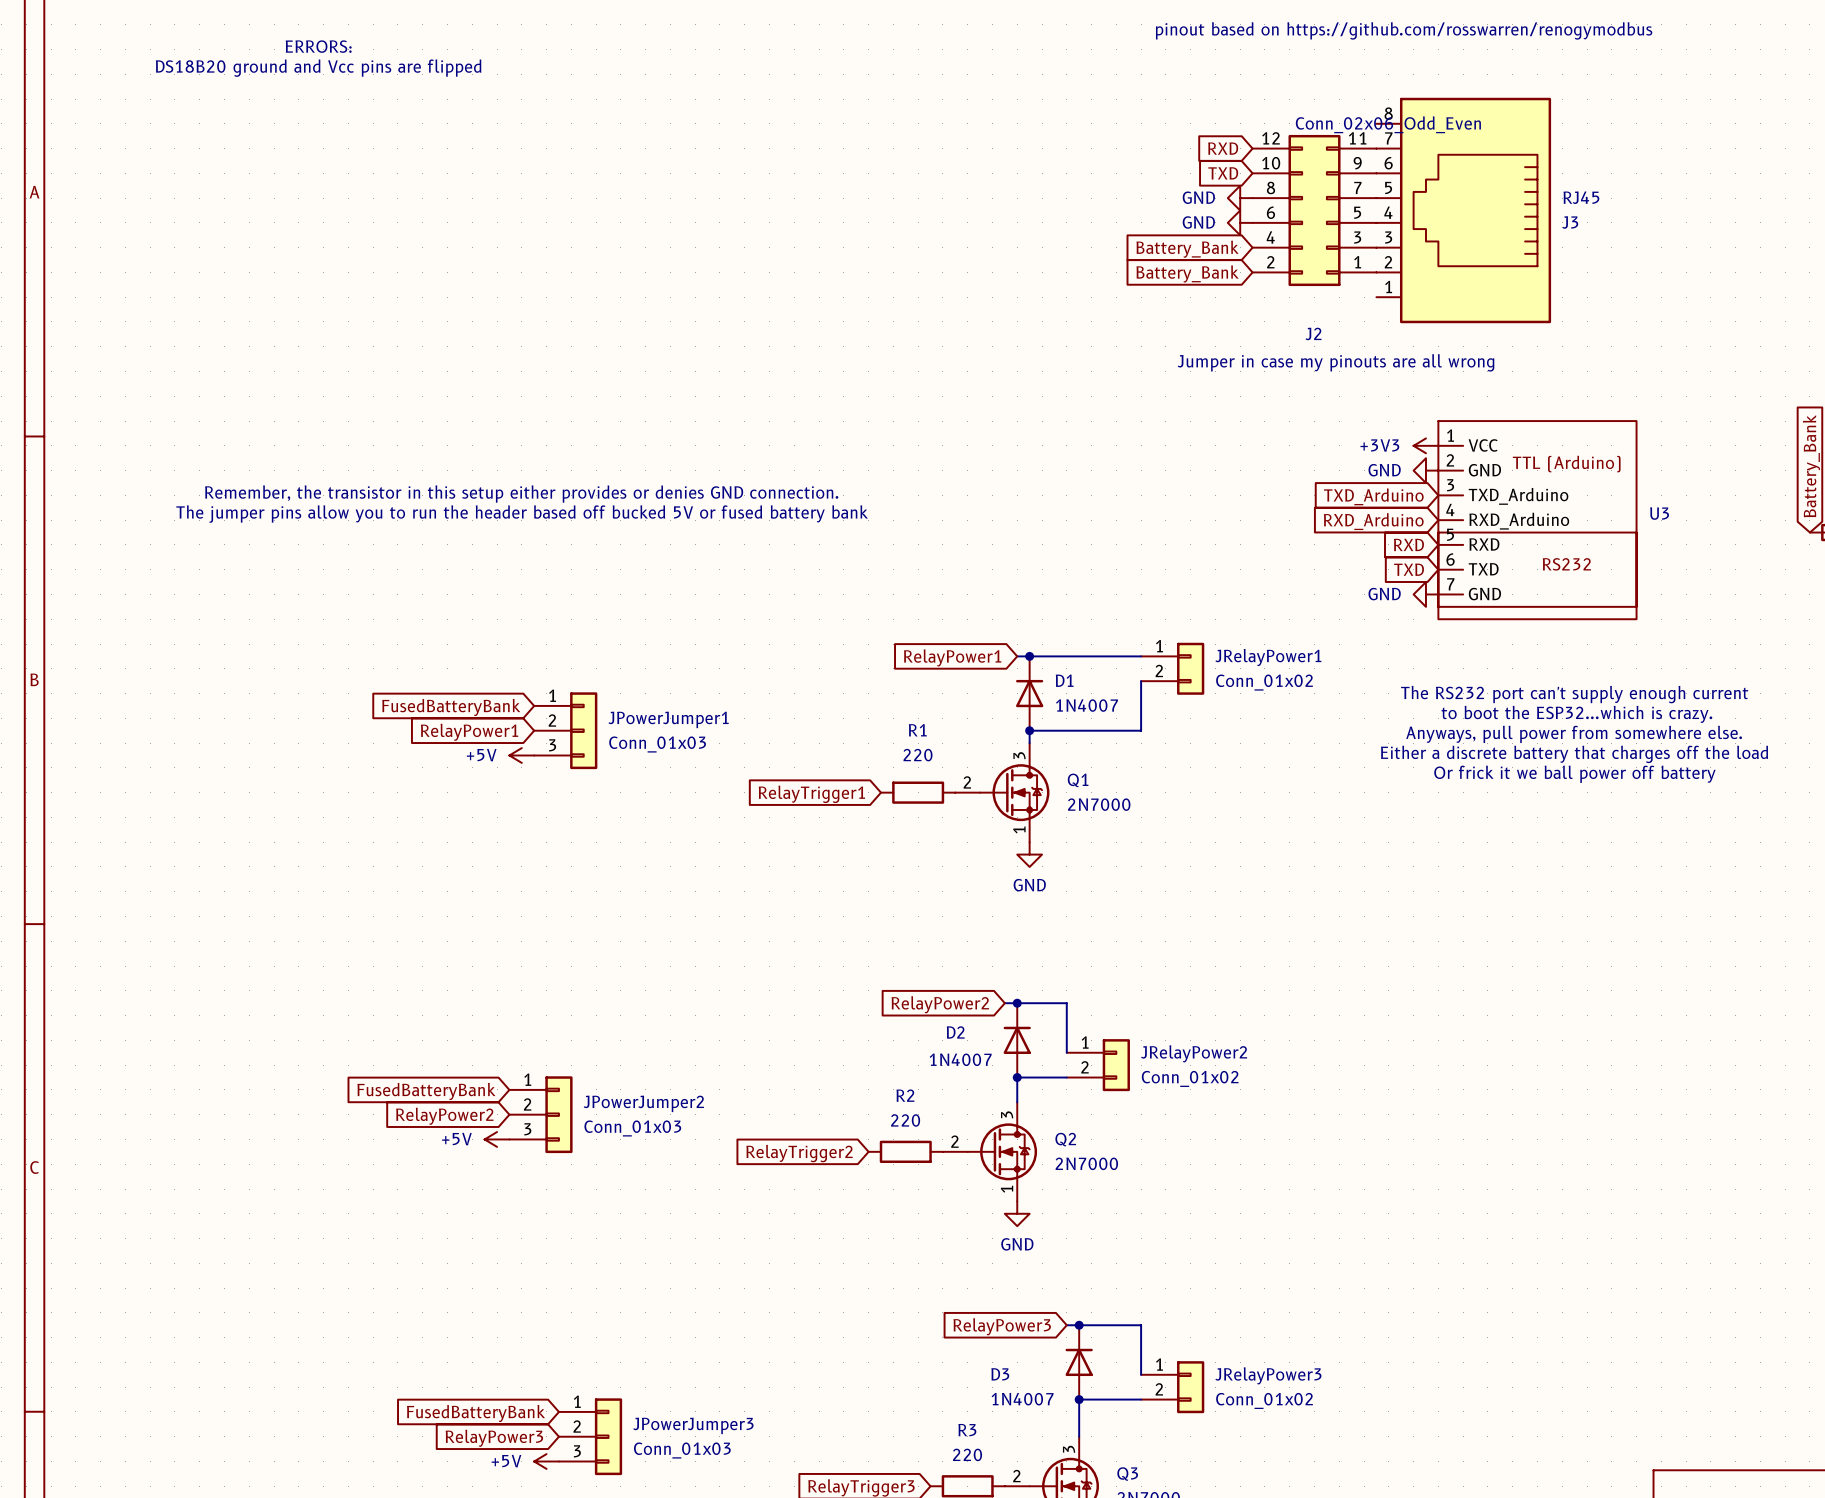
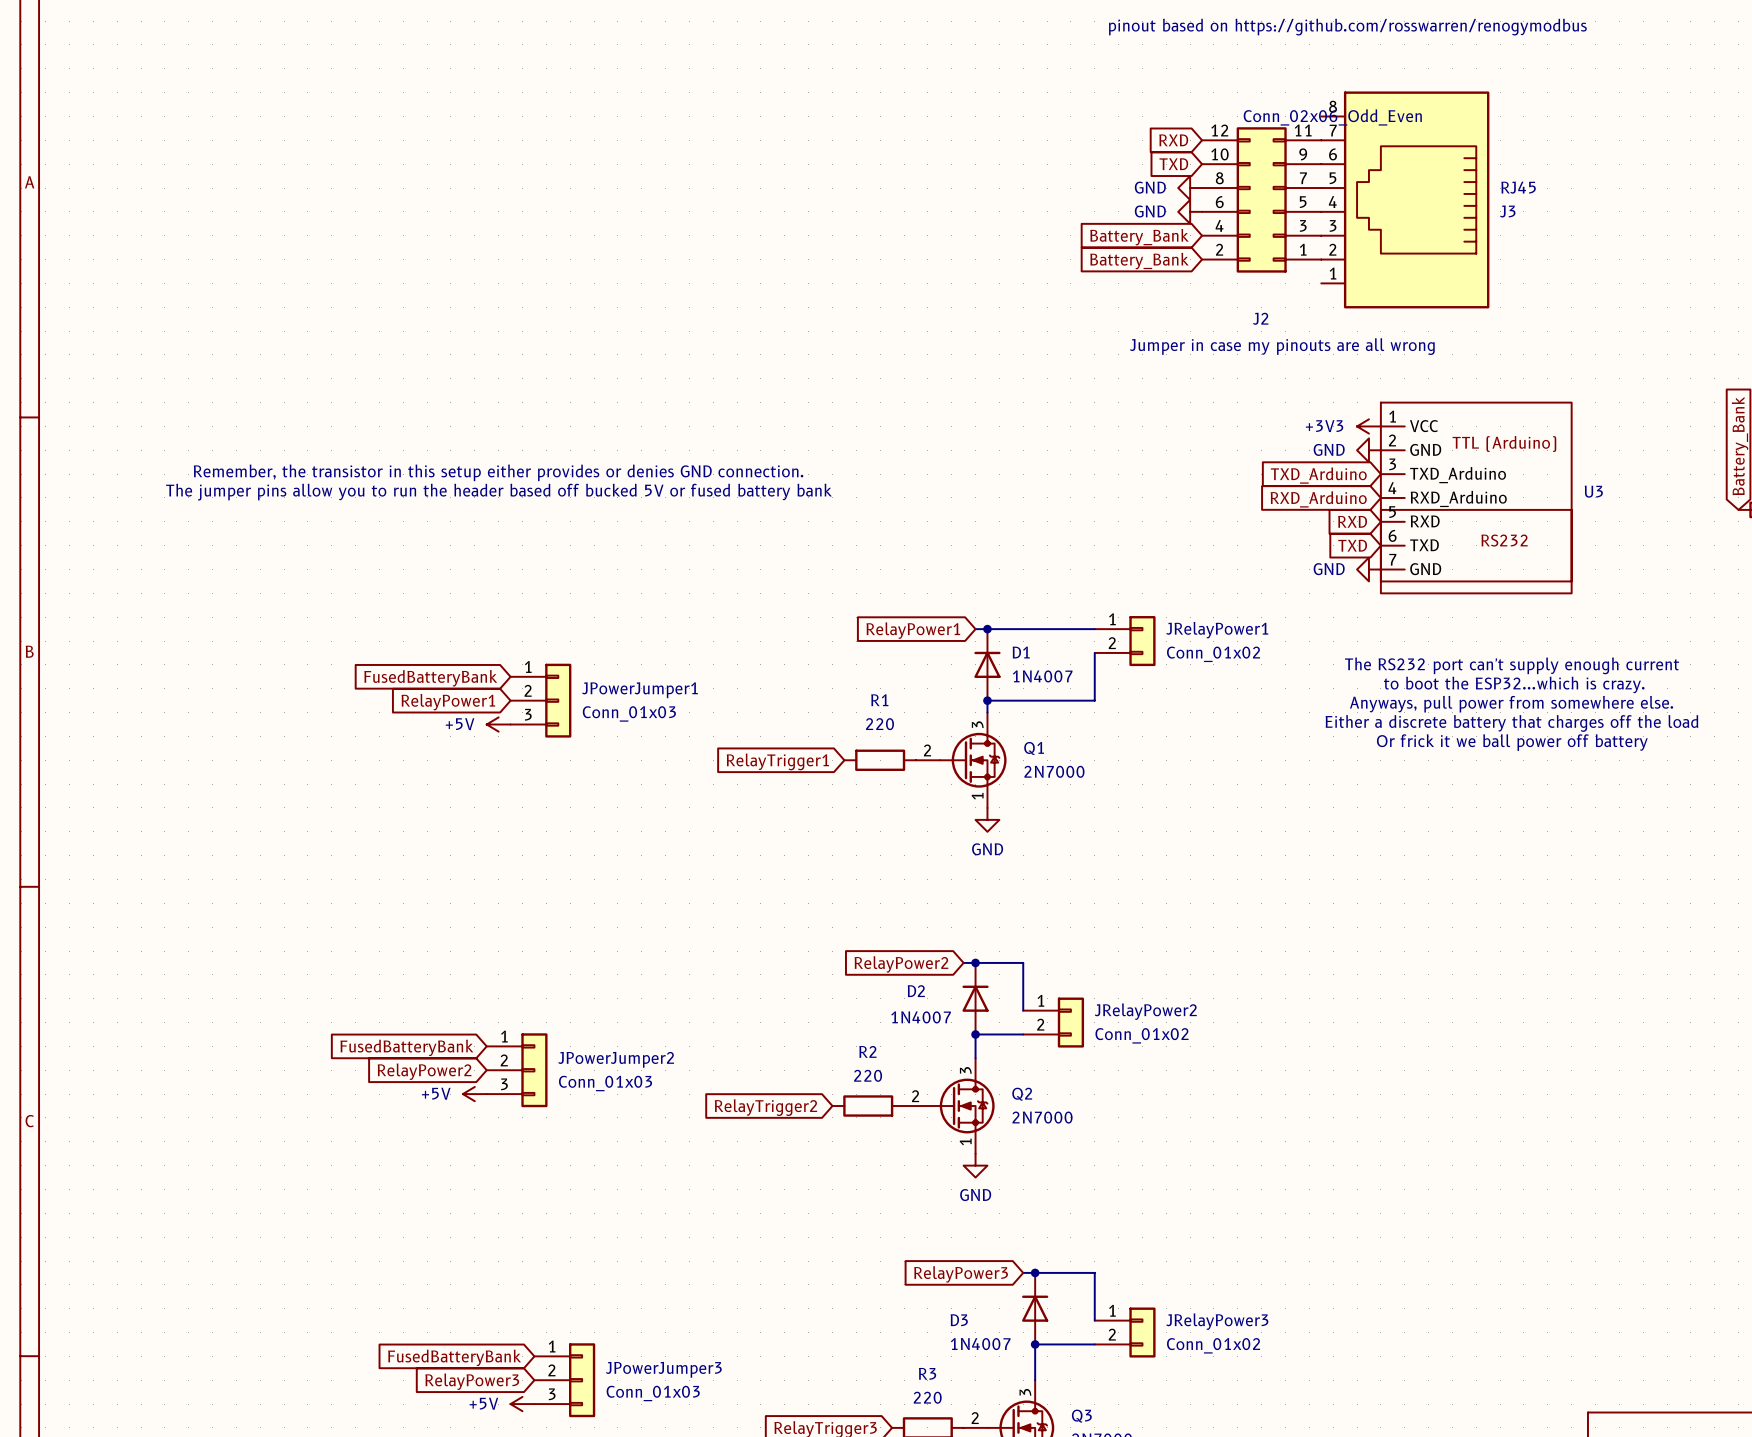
text: ERRORS: (318, 46) -> none
text: DS18B20 ground and Vcc pins are flipped (318, 68) -> none

